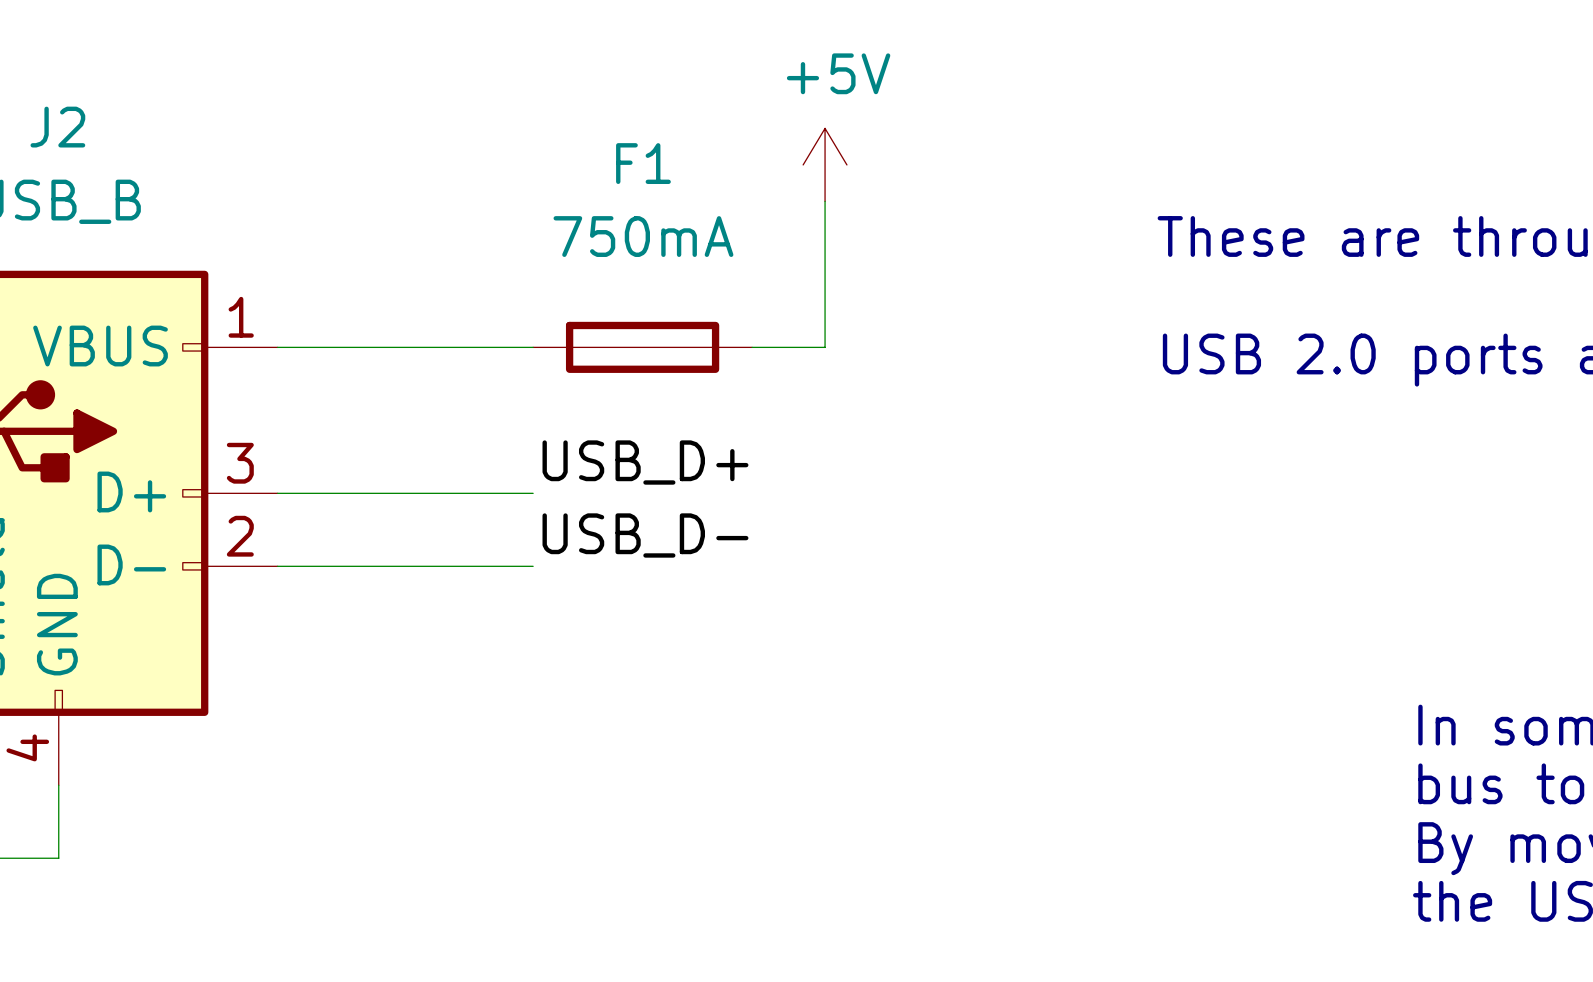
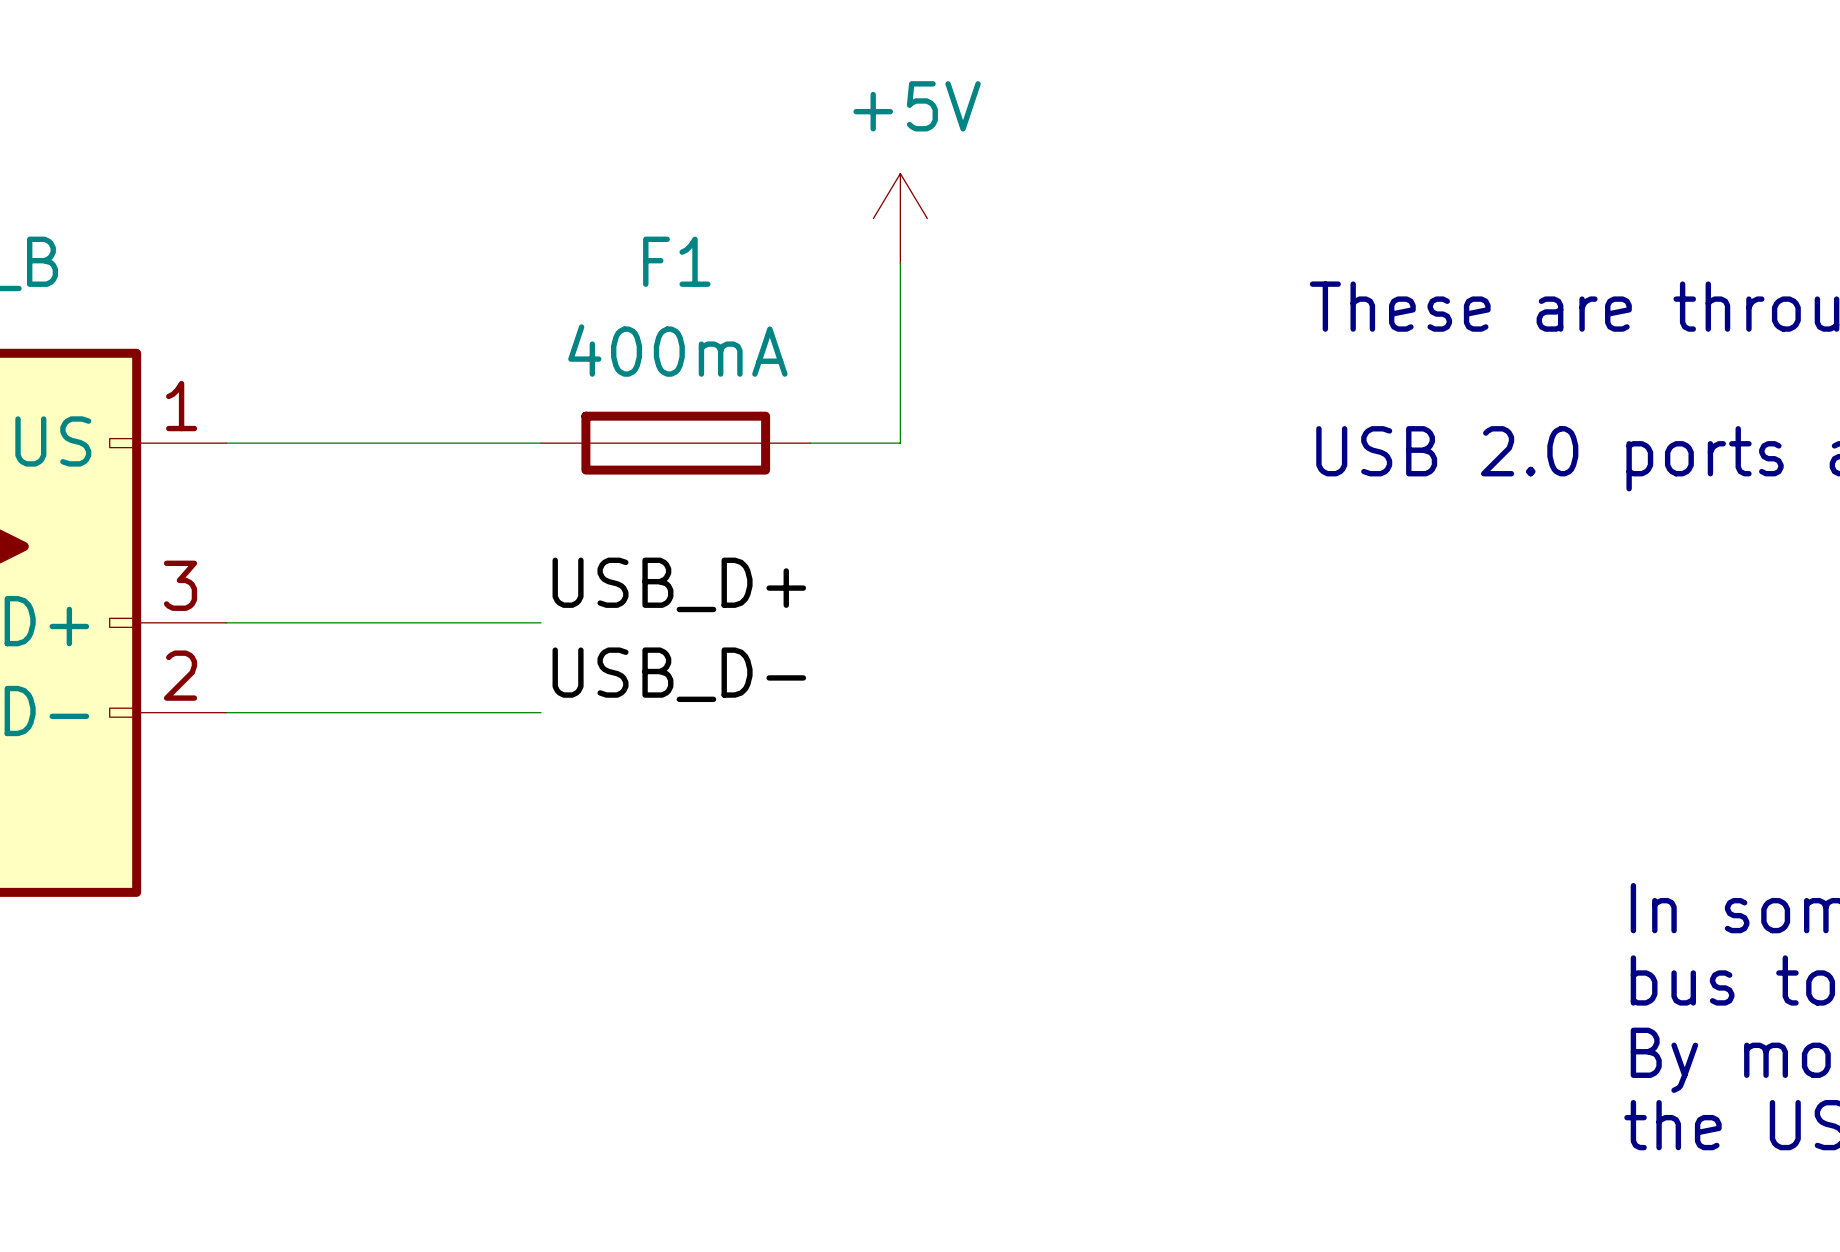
F1 name position: F1 (643, 163) -> F1 (676, 261)
F1 value: 750mA (643, 236) -> 400mA (677, 350)

